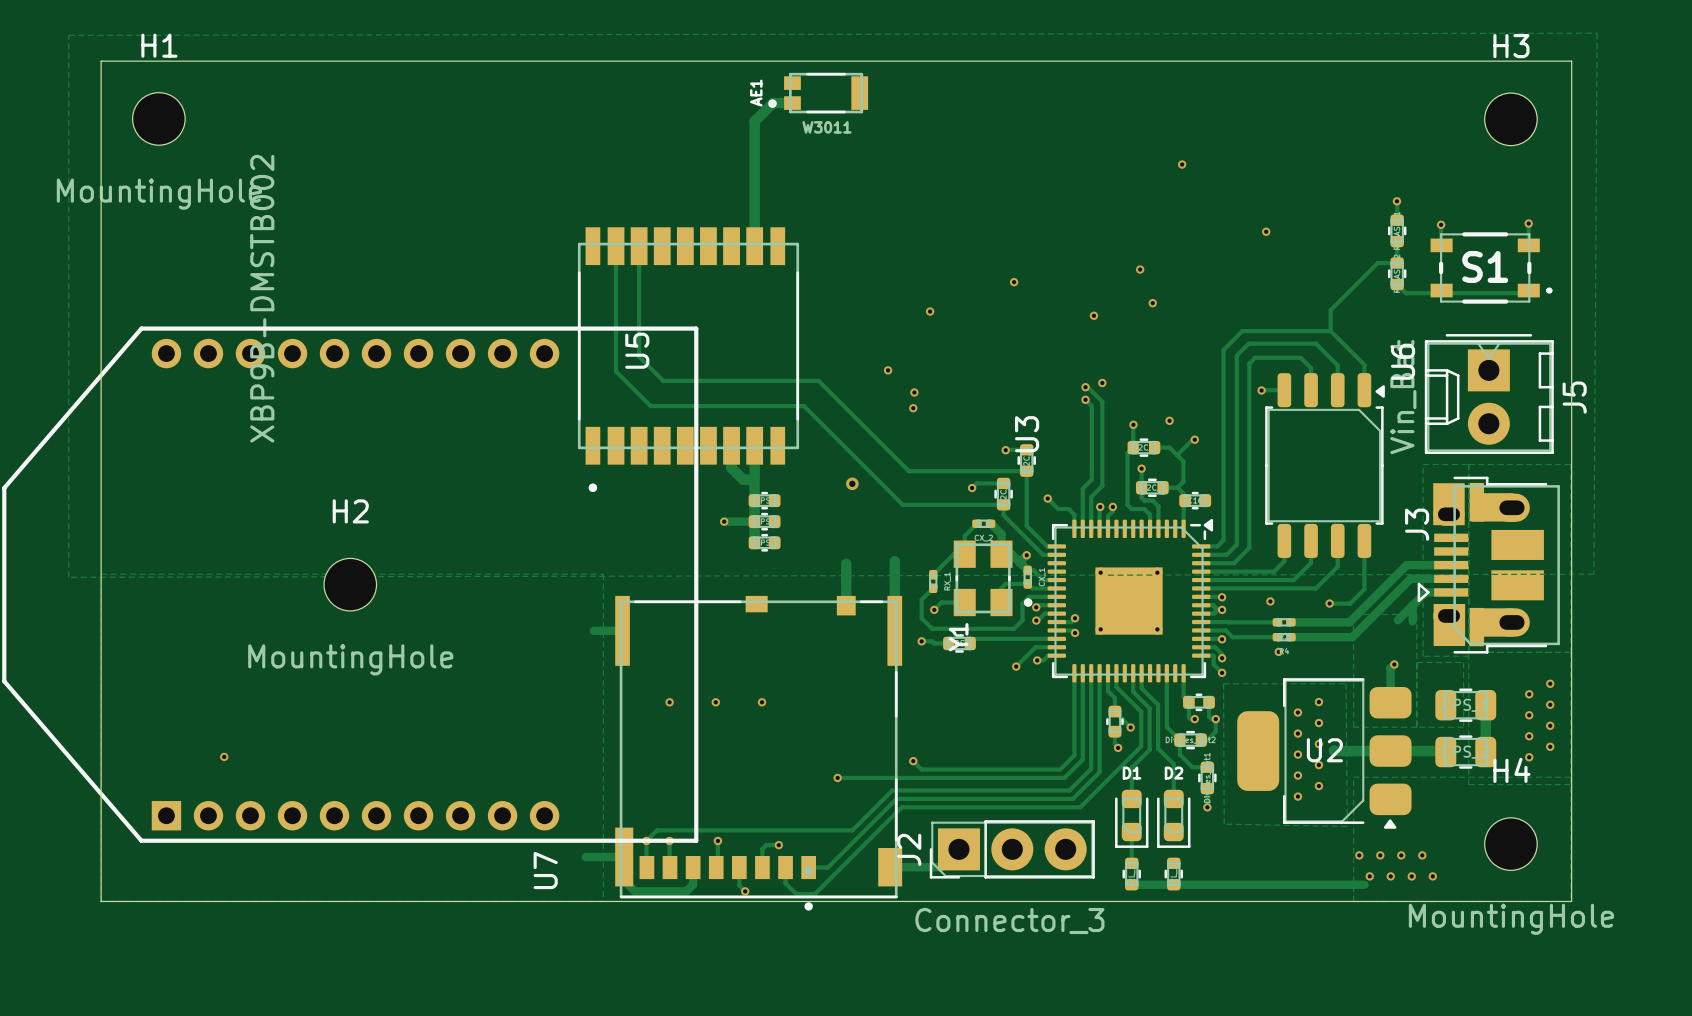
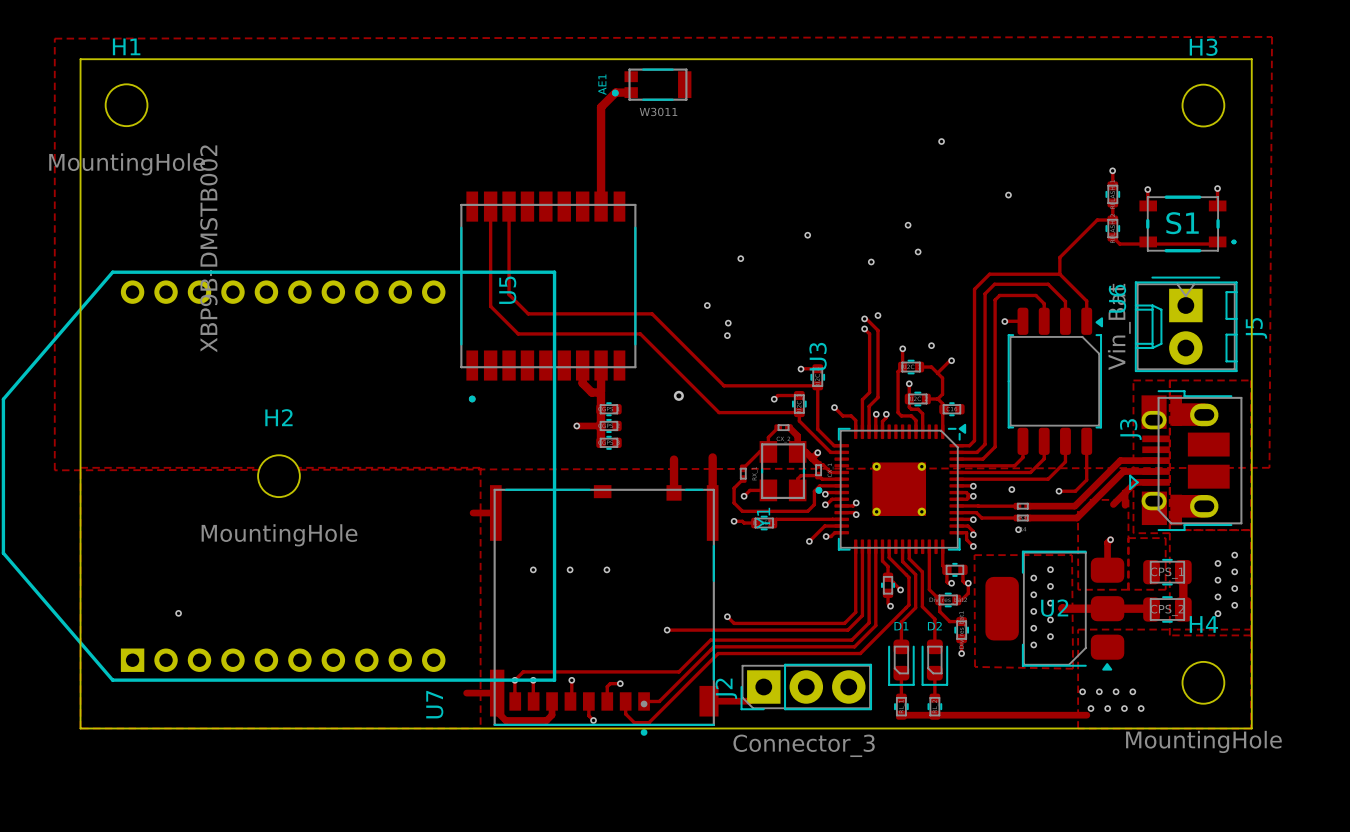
track: none -> (934, 673) (934, 698)

